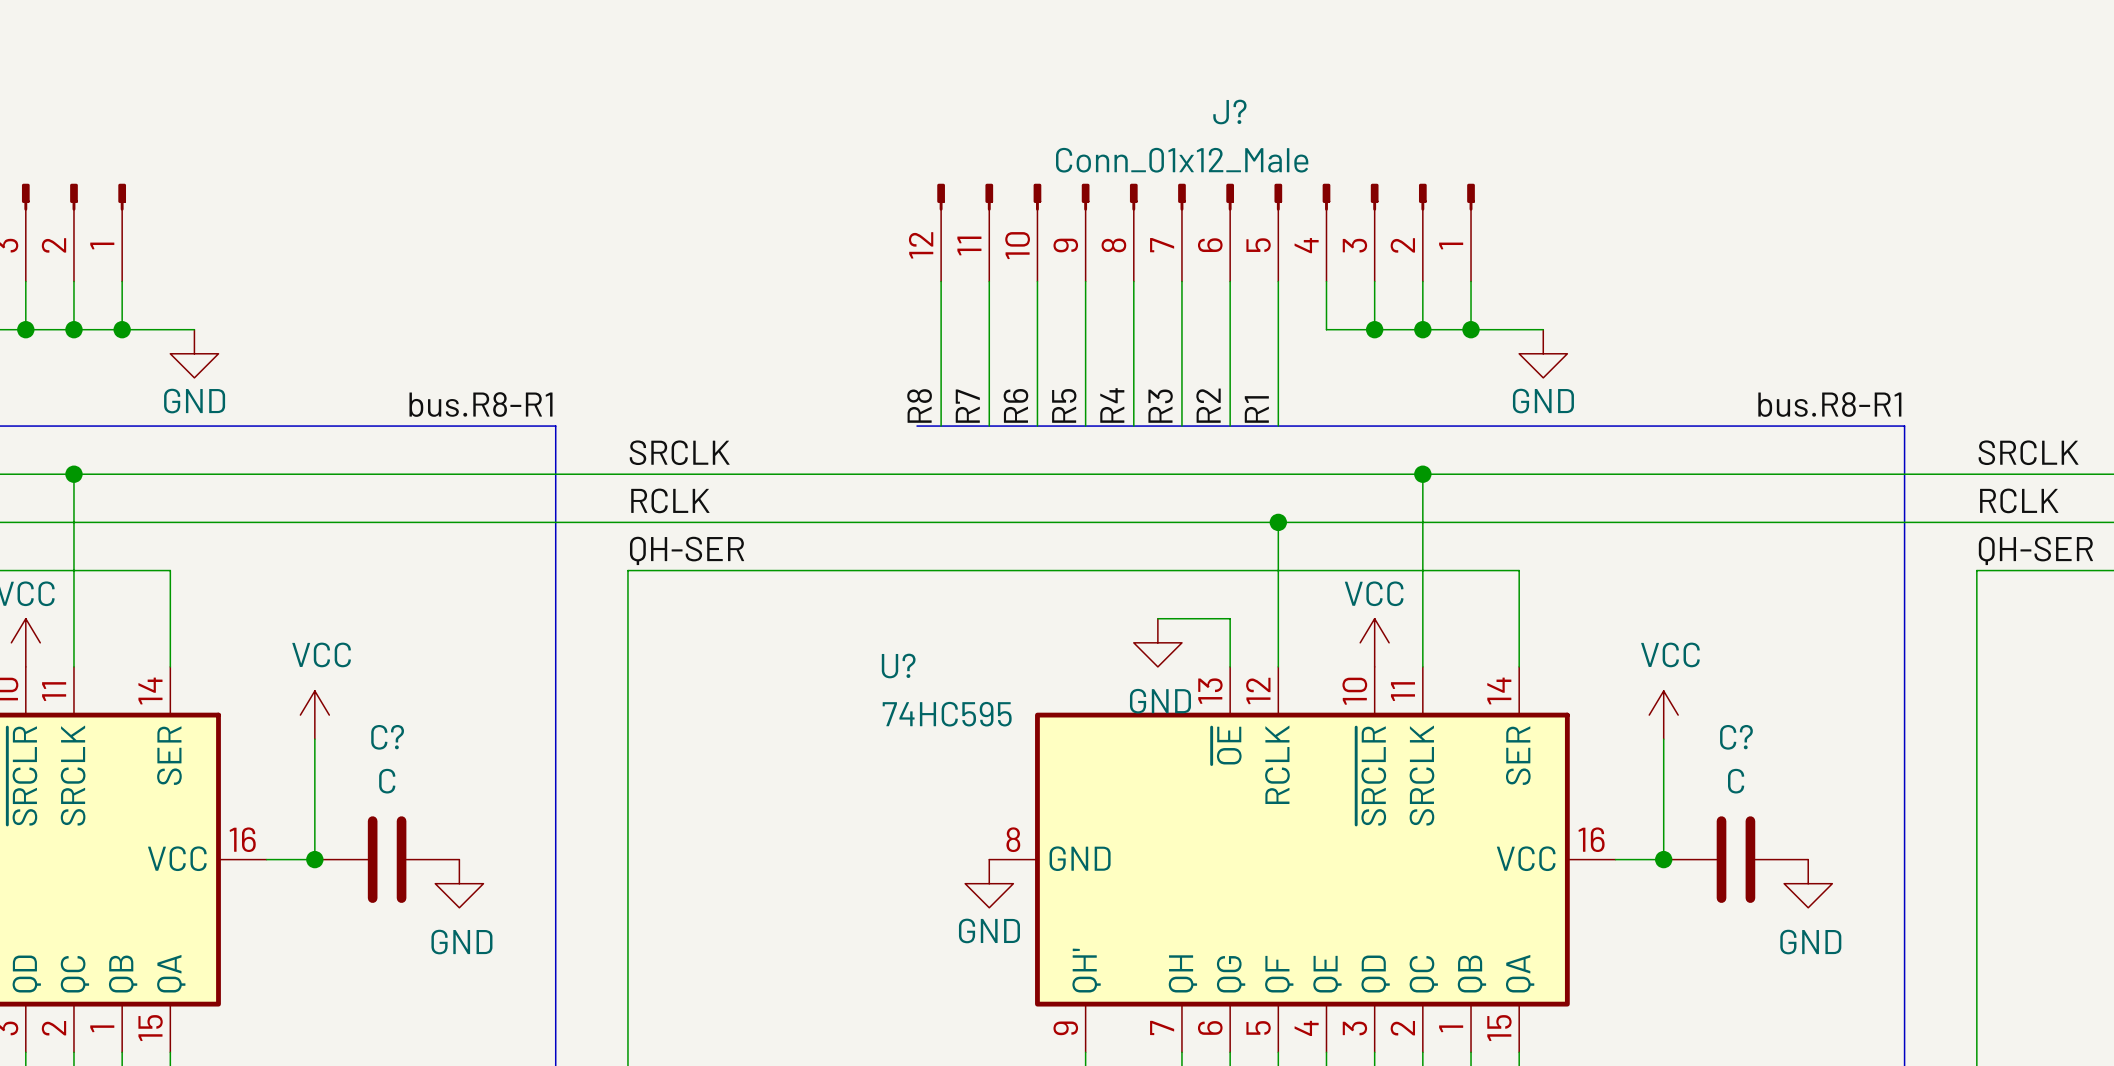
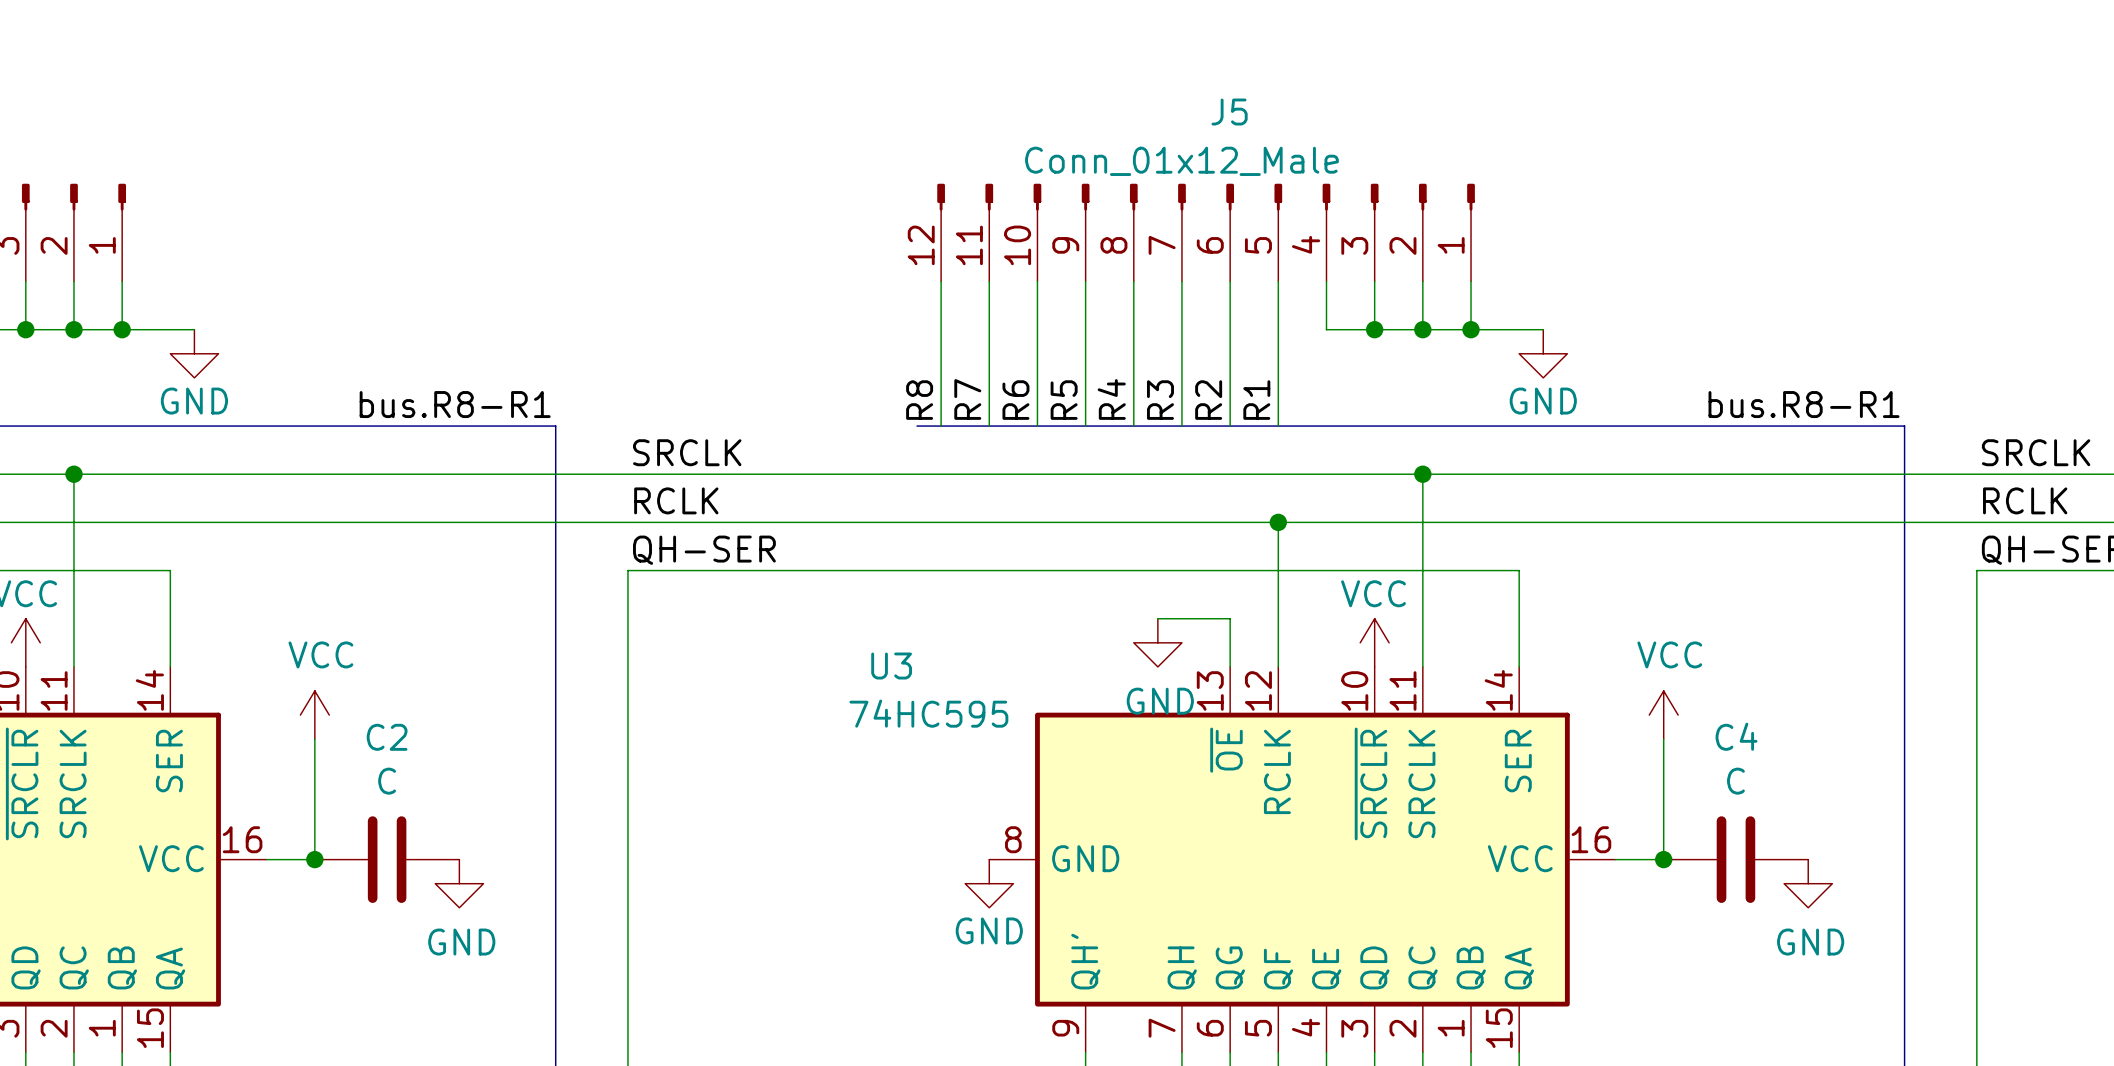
J? name: J? (1229, 112) -> J5 (1229, 112)
U? name: U? (898, 665) -> U3 (891, 666)
C? name: C? (387, 737) -> C2 (387, 737)
C? name: C? (1736, 737) -> C4 (1736, 736)

